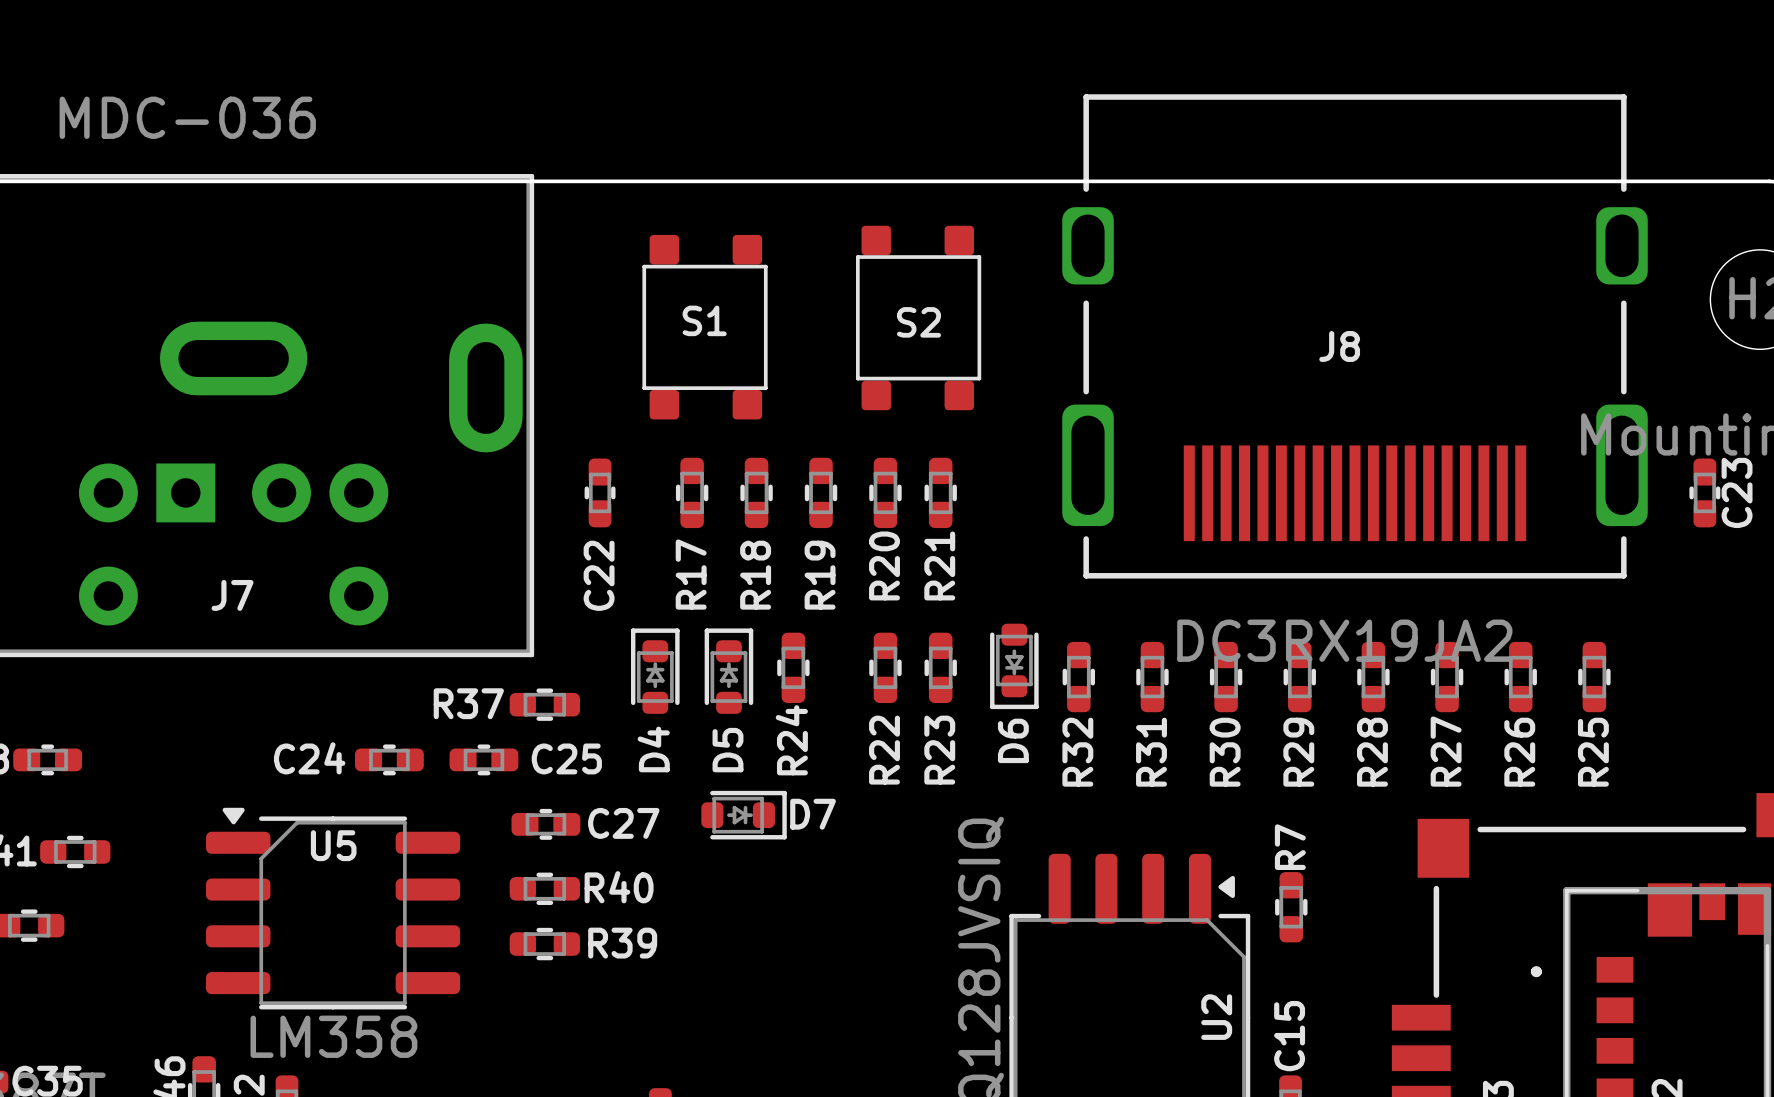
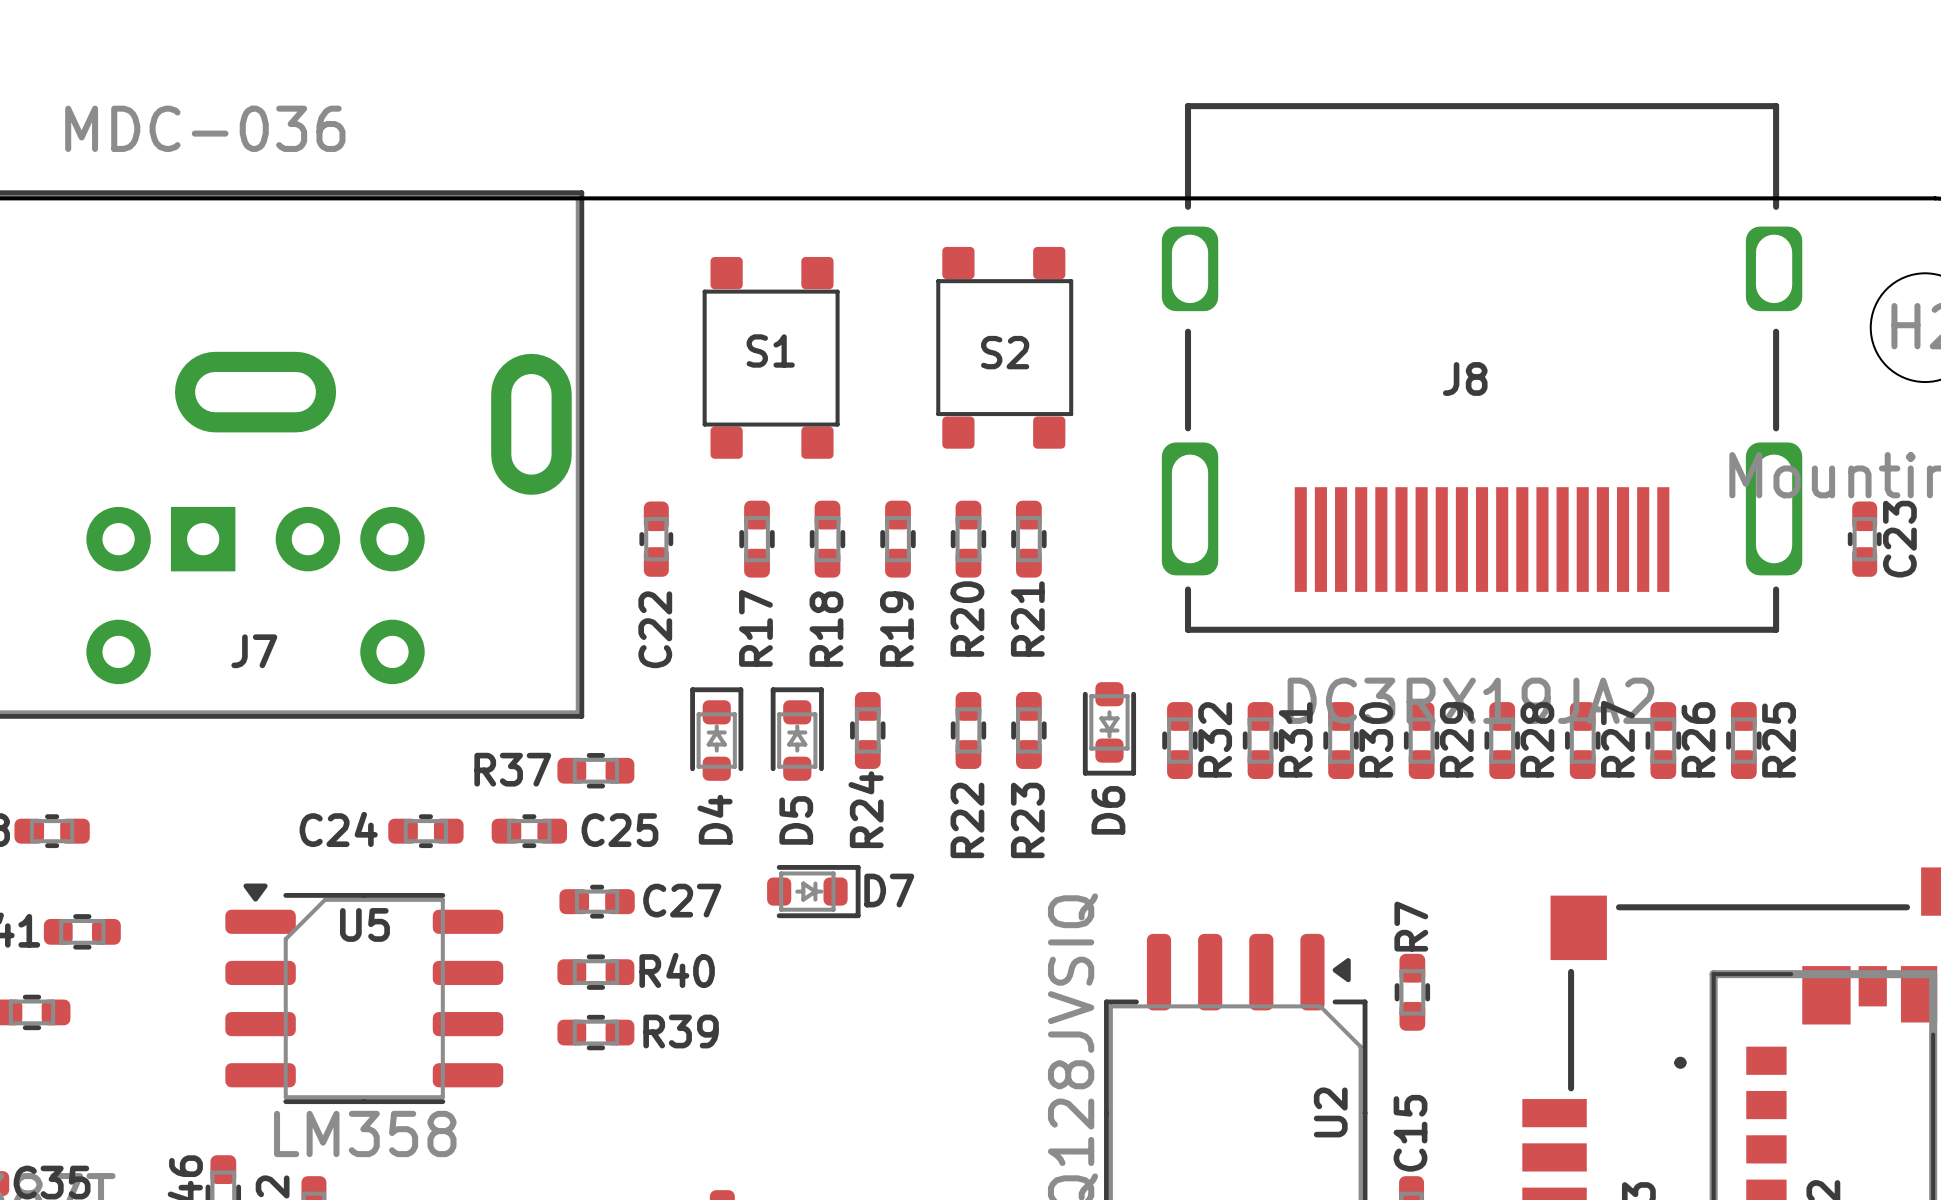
R27 name position: R27 (1446, 751) -> R27 (1617, 739)
R32 name position: R32 (1077, 752) -> R32 (1215, 739)
R31 name position: R31 (1151, 752) -> R31 (1295, 739)
R30 name position: R30 (1225, 752) -> R30 (1376, 739)
R29 name position: R29 (1298, 752) -> R29 (1456, 739)
R28 name position: R28 (1372, 752) -> R28 (1537, 739)
R26 name position: R26 (1519, 752) -> R26 (1698, 739)
R25 name position: R25 (1593, 752) -> R25 (1779, 739)

